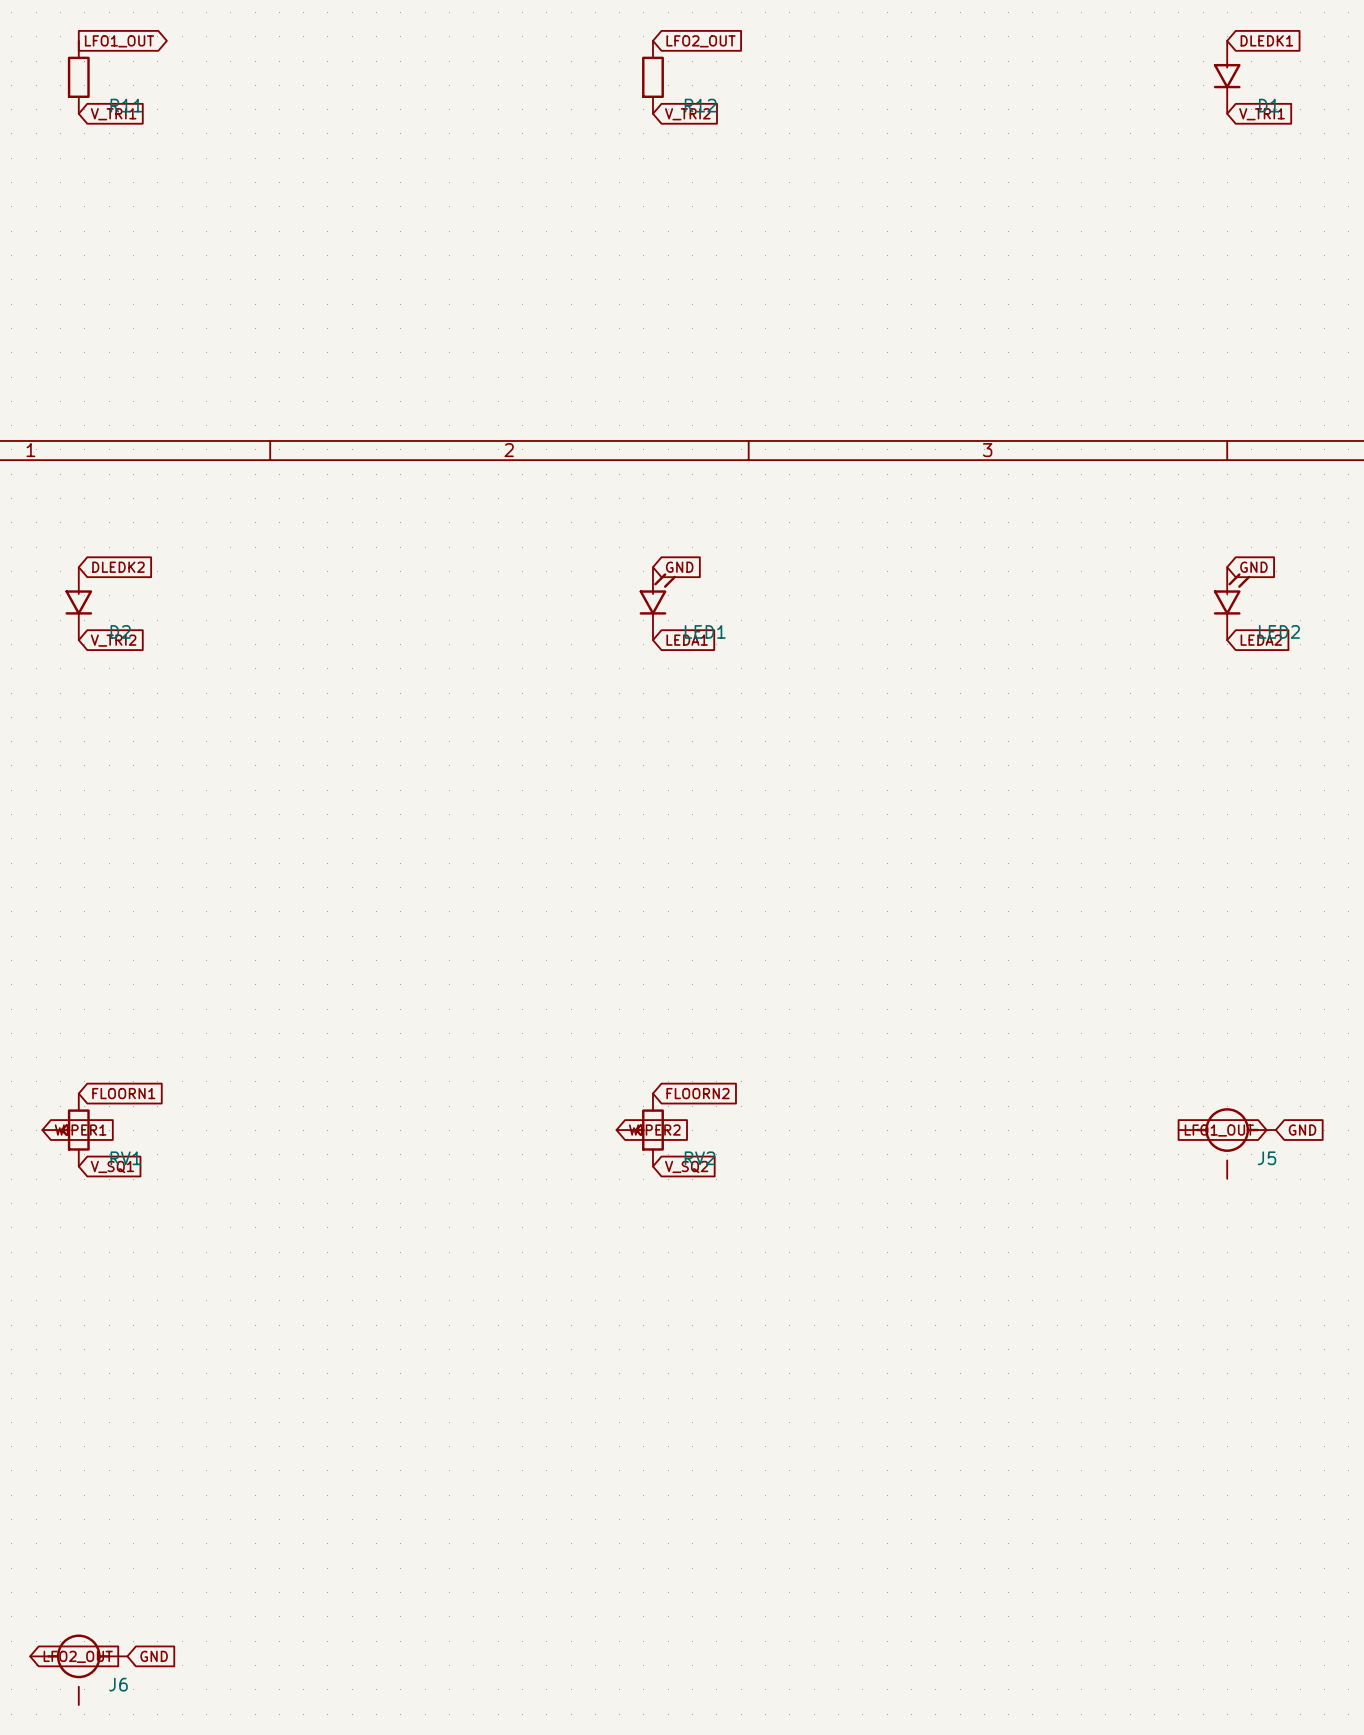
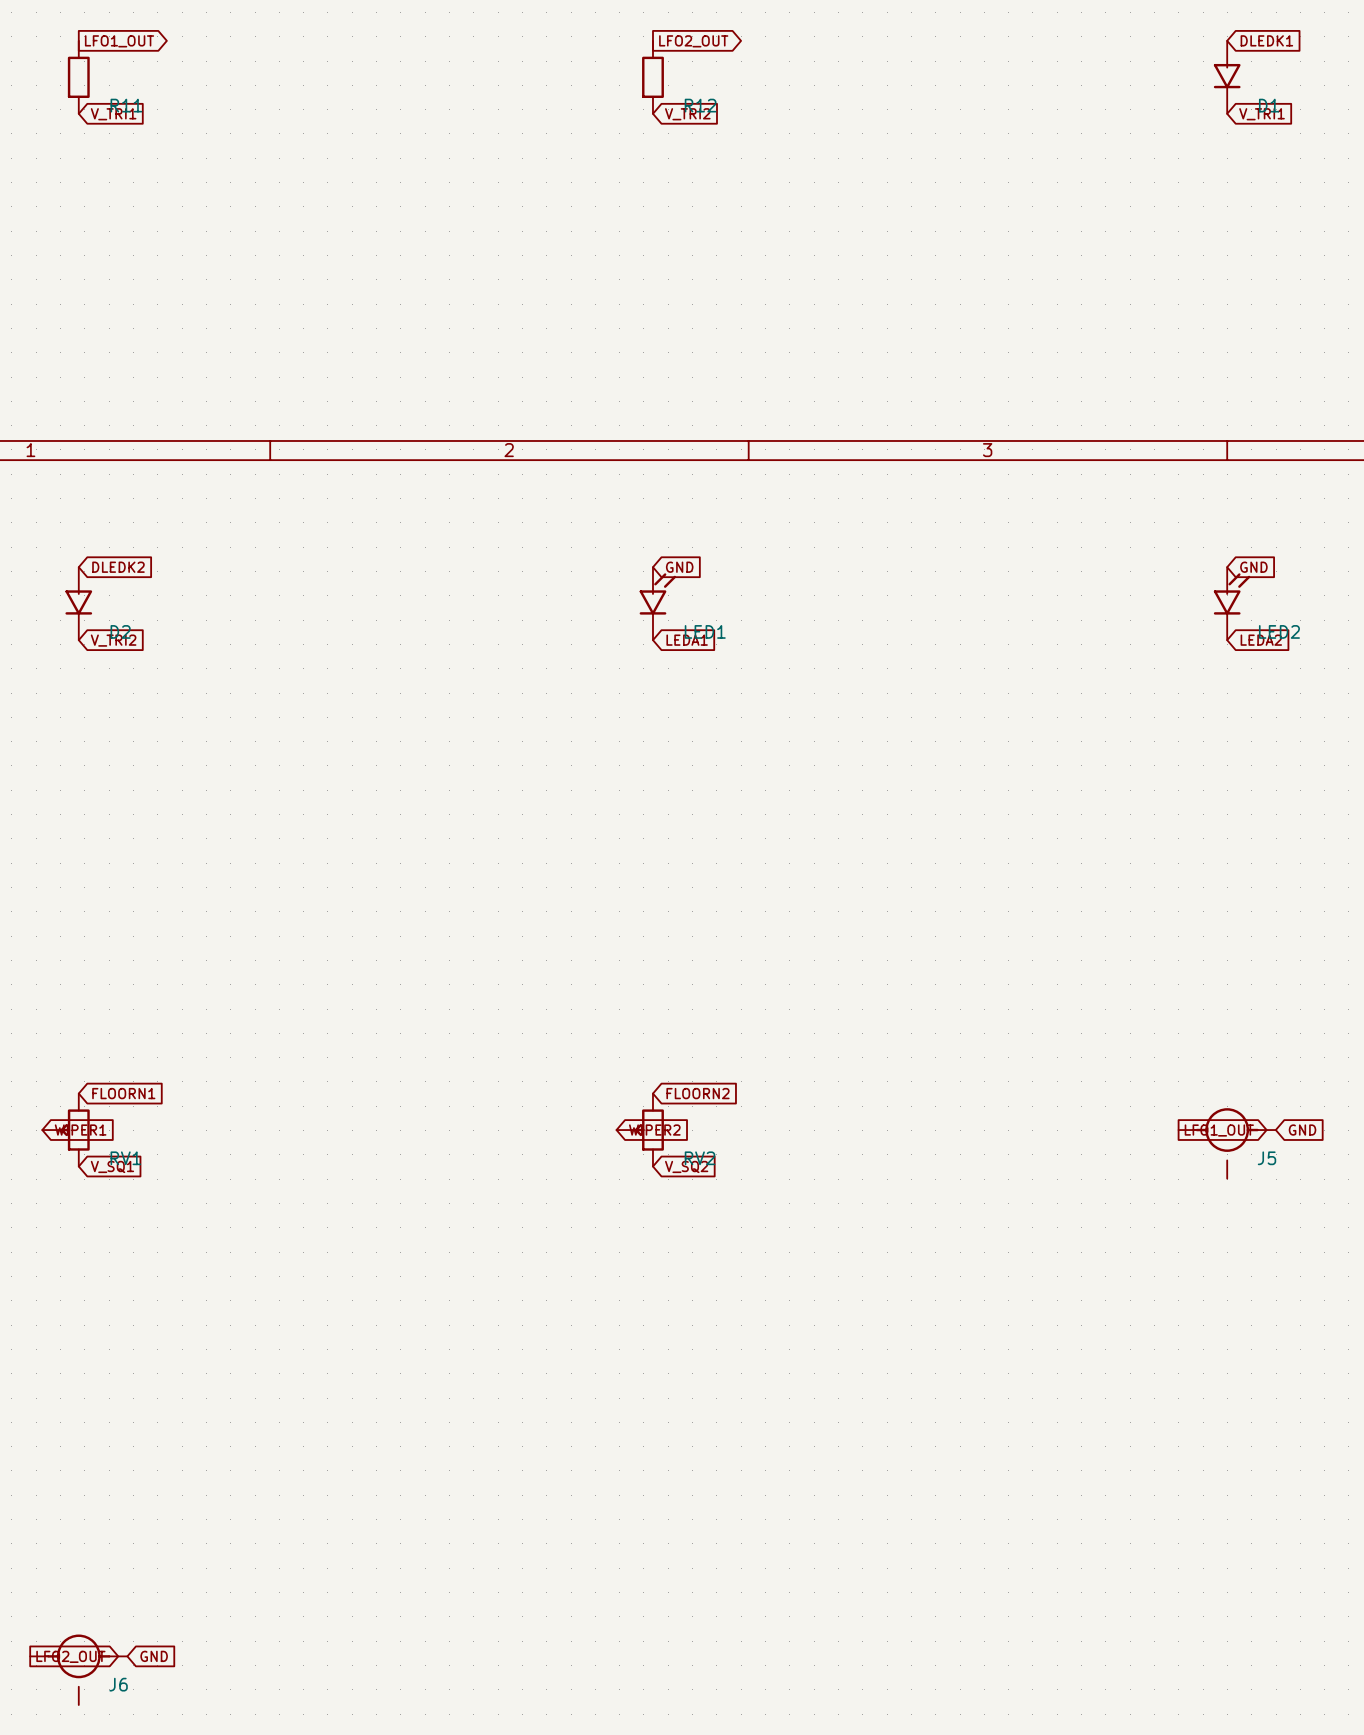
global label shape: input (701, 41) -> output (693, 41)
global label shape: input (78, 1656) -> output (70, 1656)

